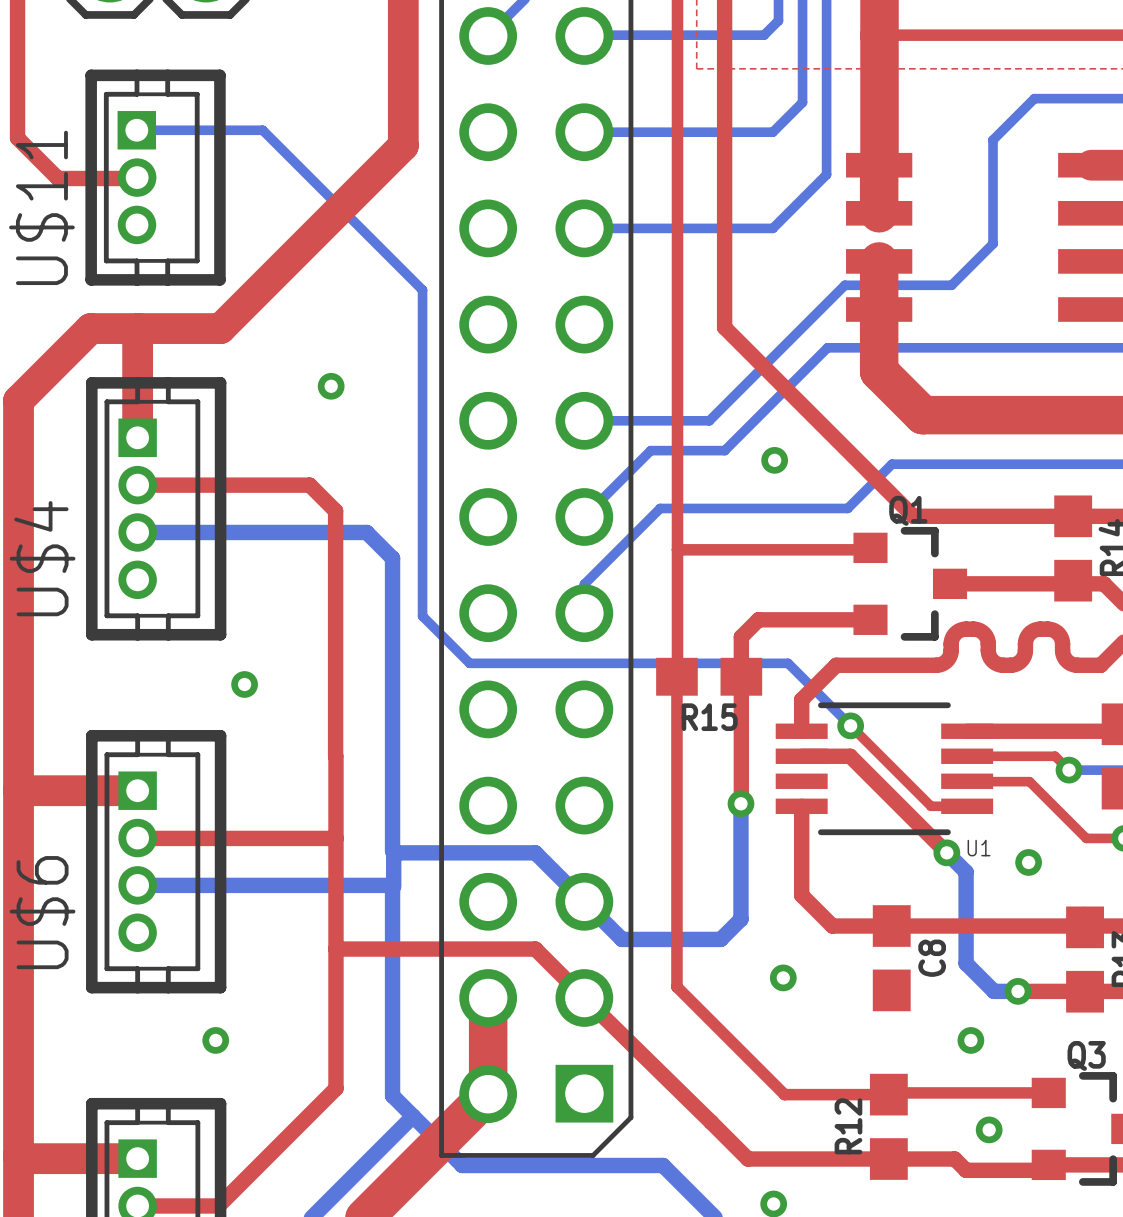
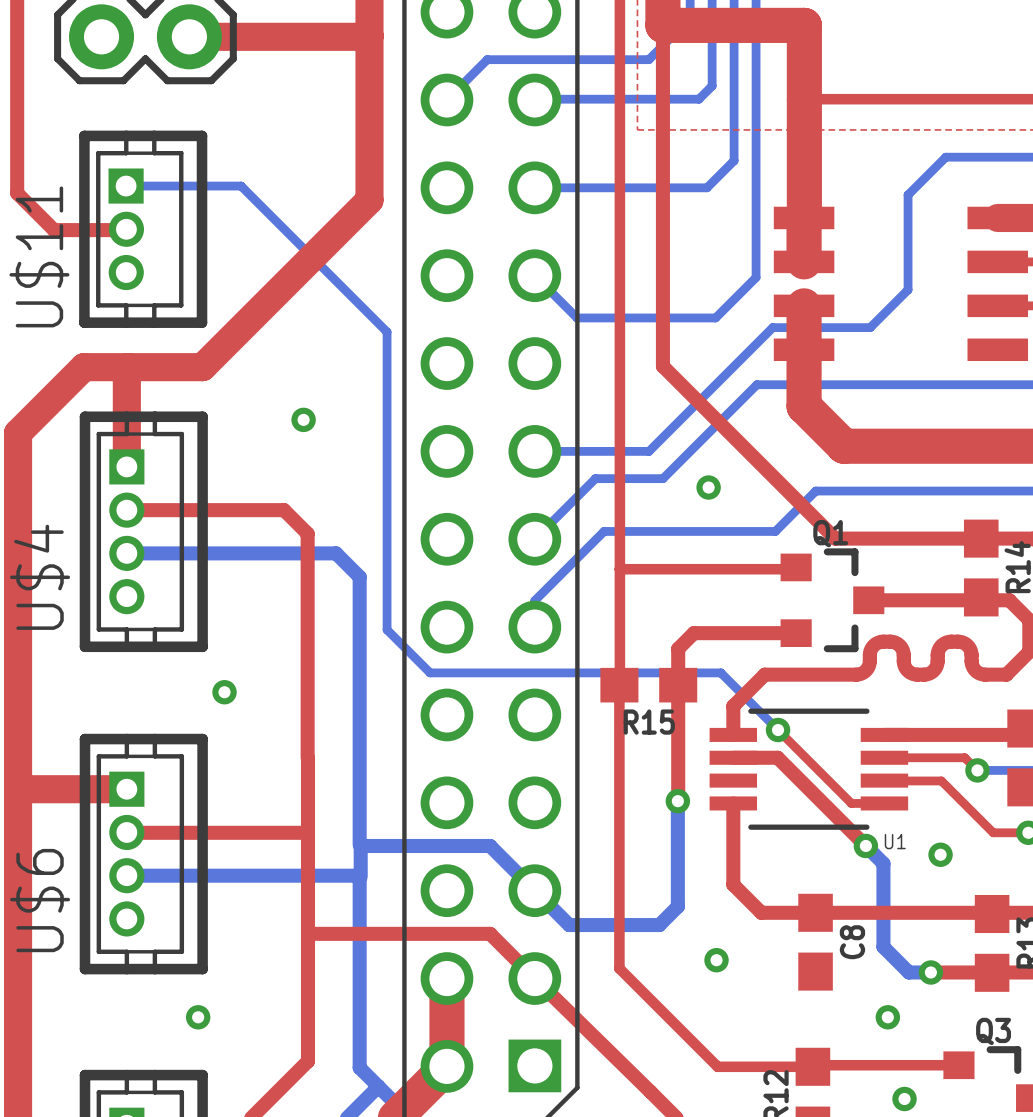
bottom track: (826, 174) (772, 228) (584, 228) -> (756, 226) (756, 277) (715, 317) (577, 317) (534, 275)

